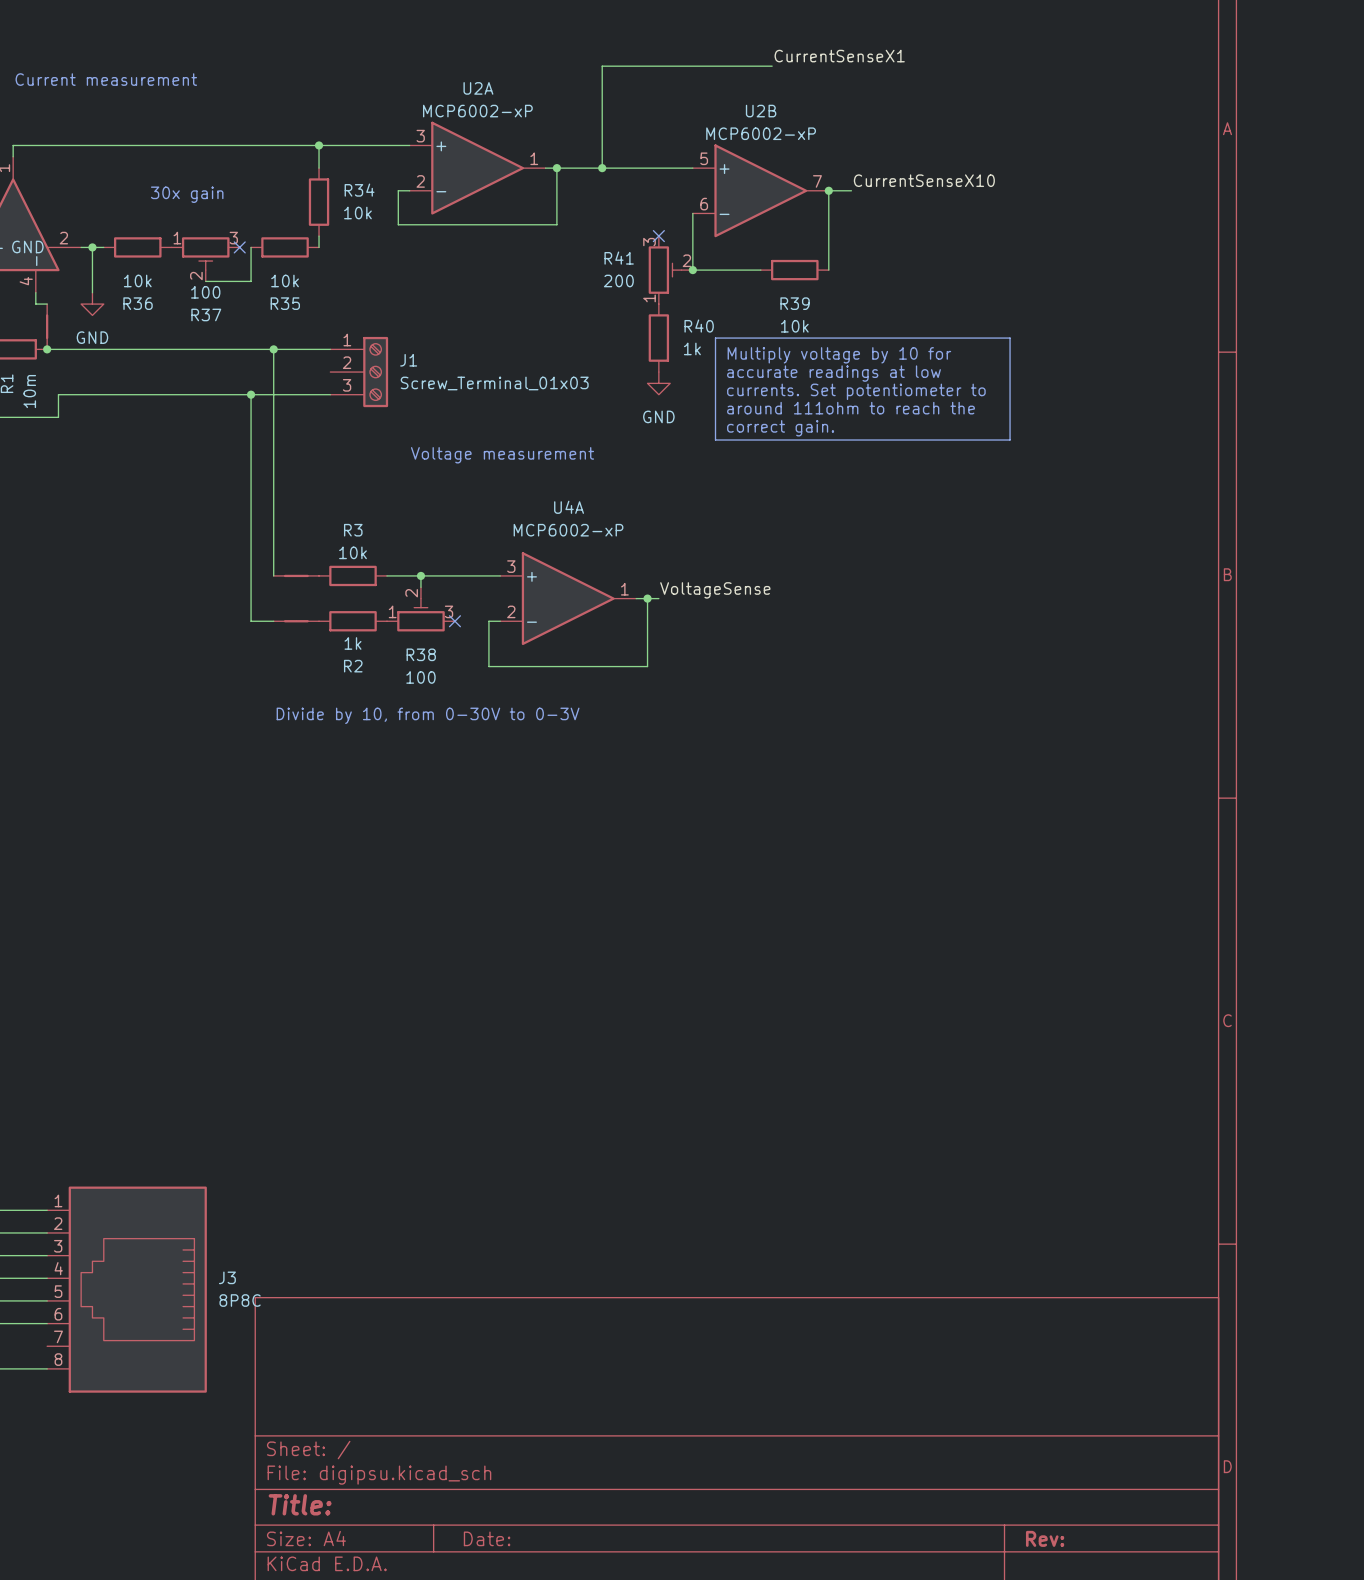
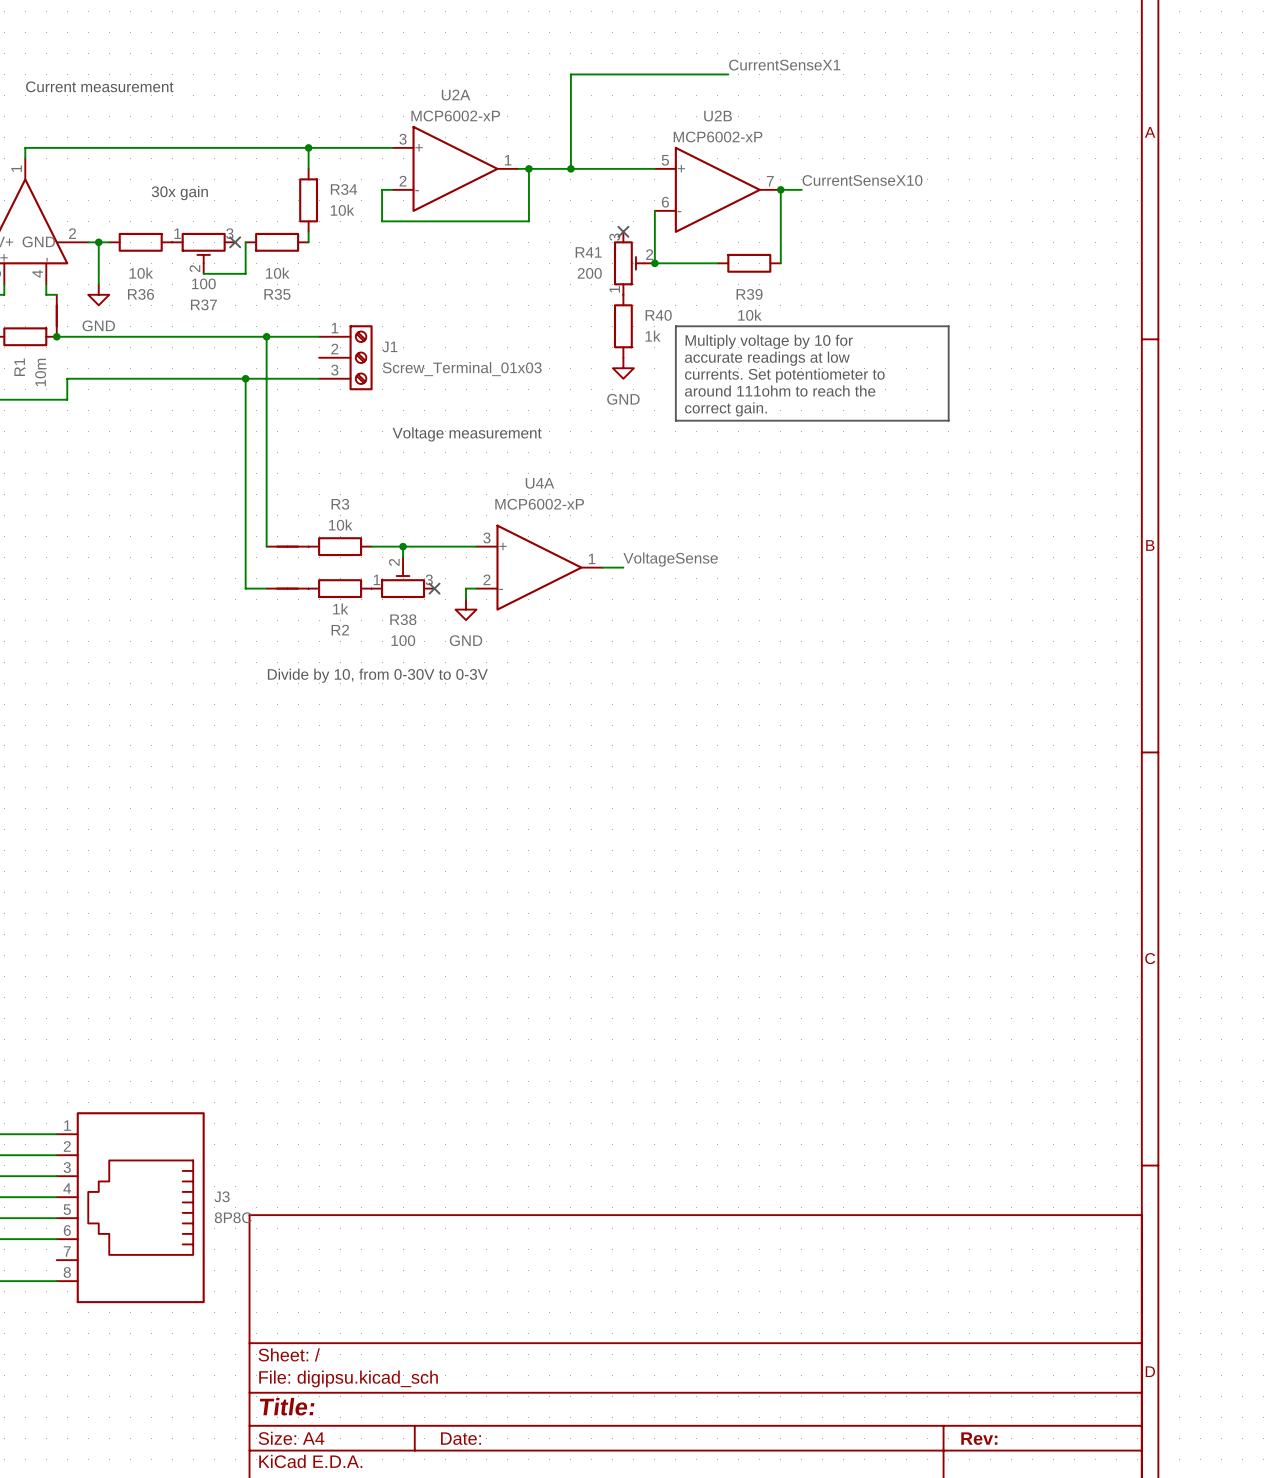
wire: (647, 598) (647, 666) (488, 666) (488, 632) -> none
junction: (647, 598) -> none
power symbol: none -> GND (466, 609)

